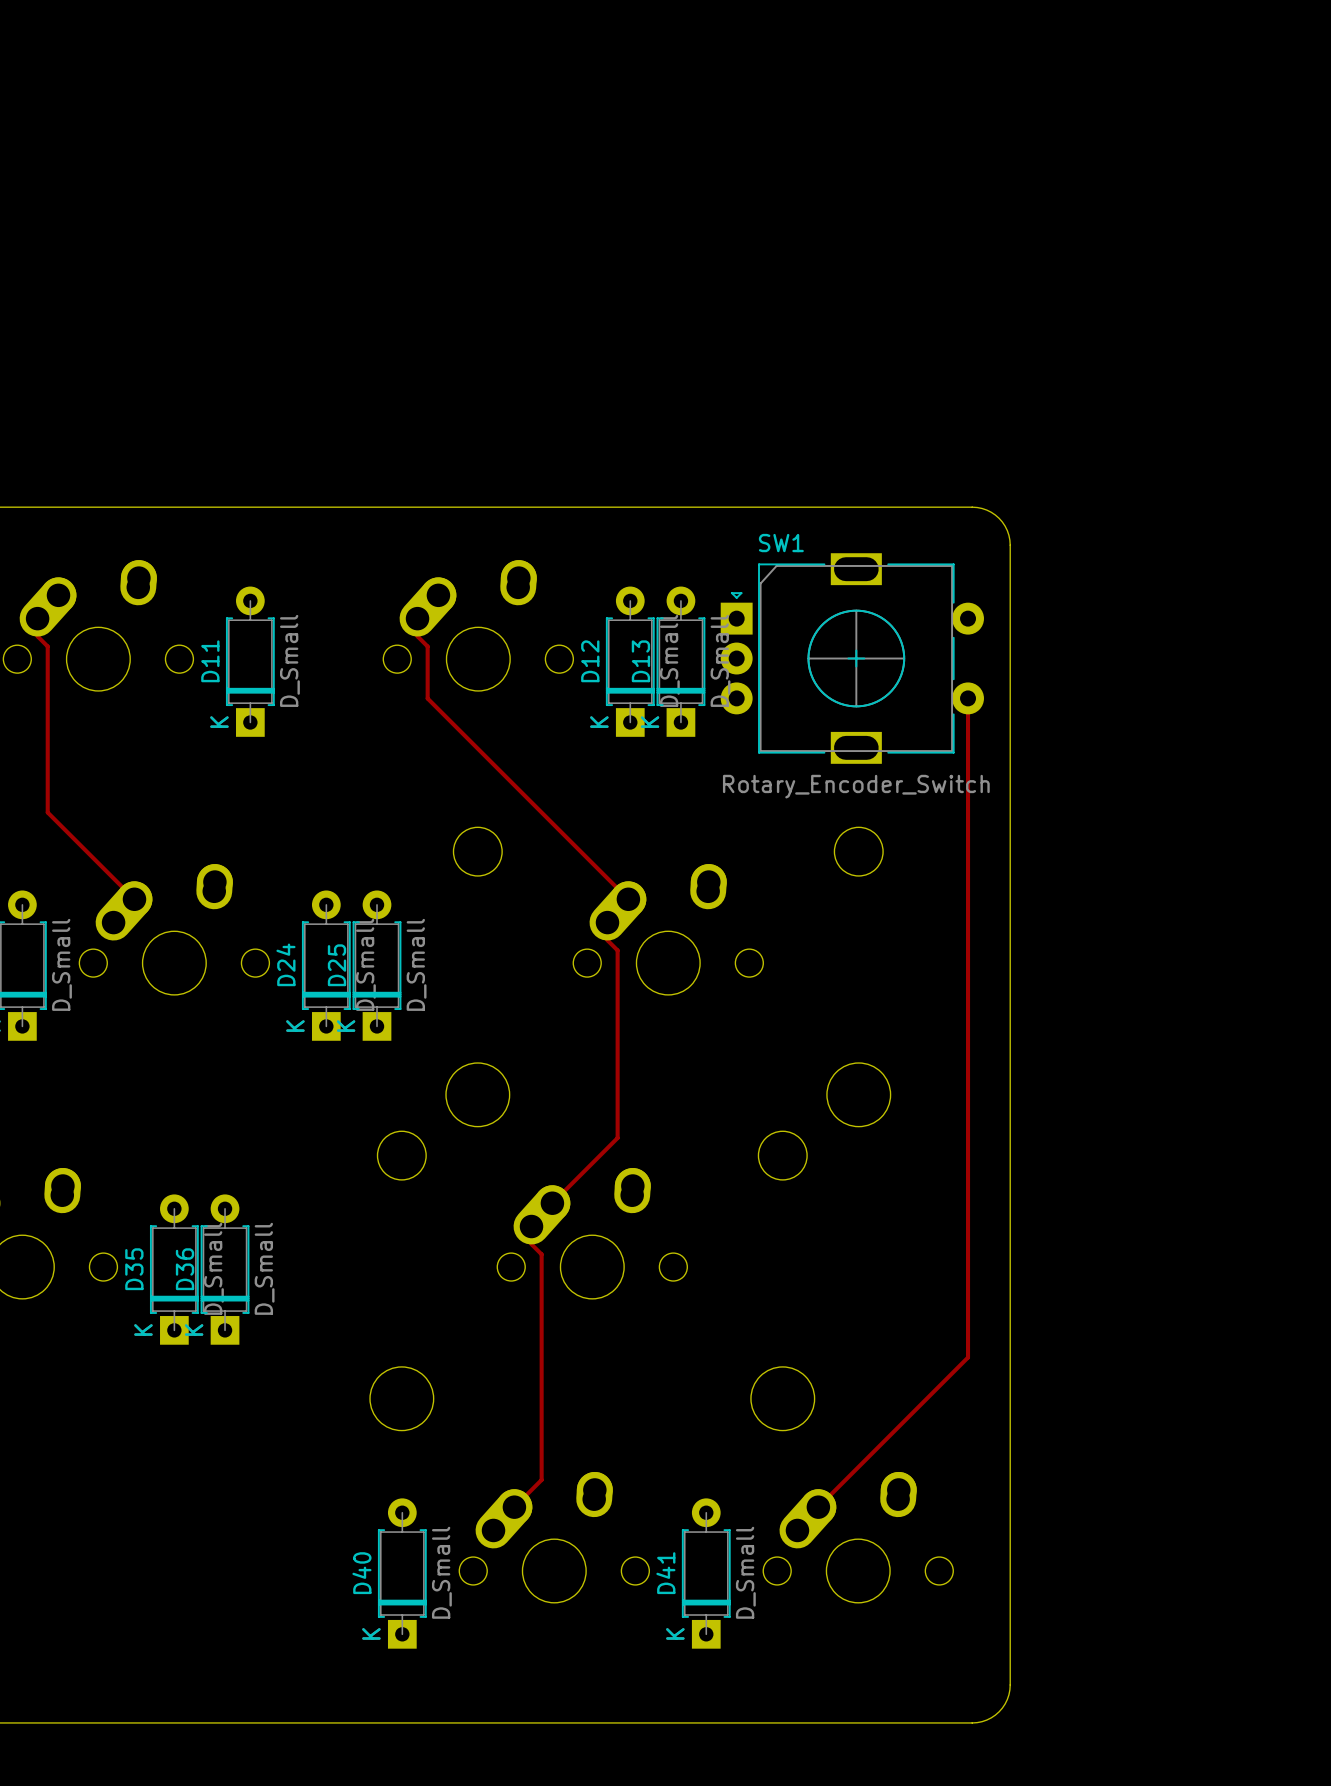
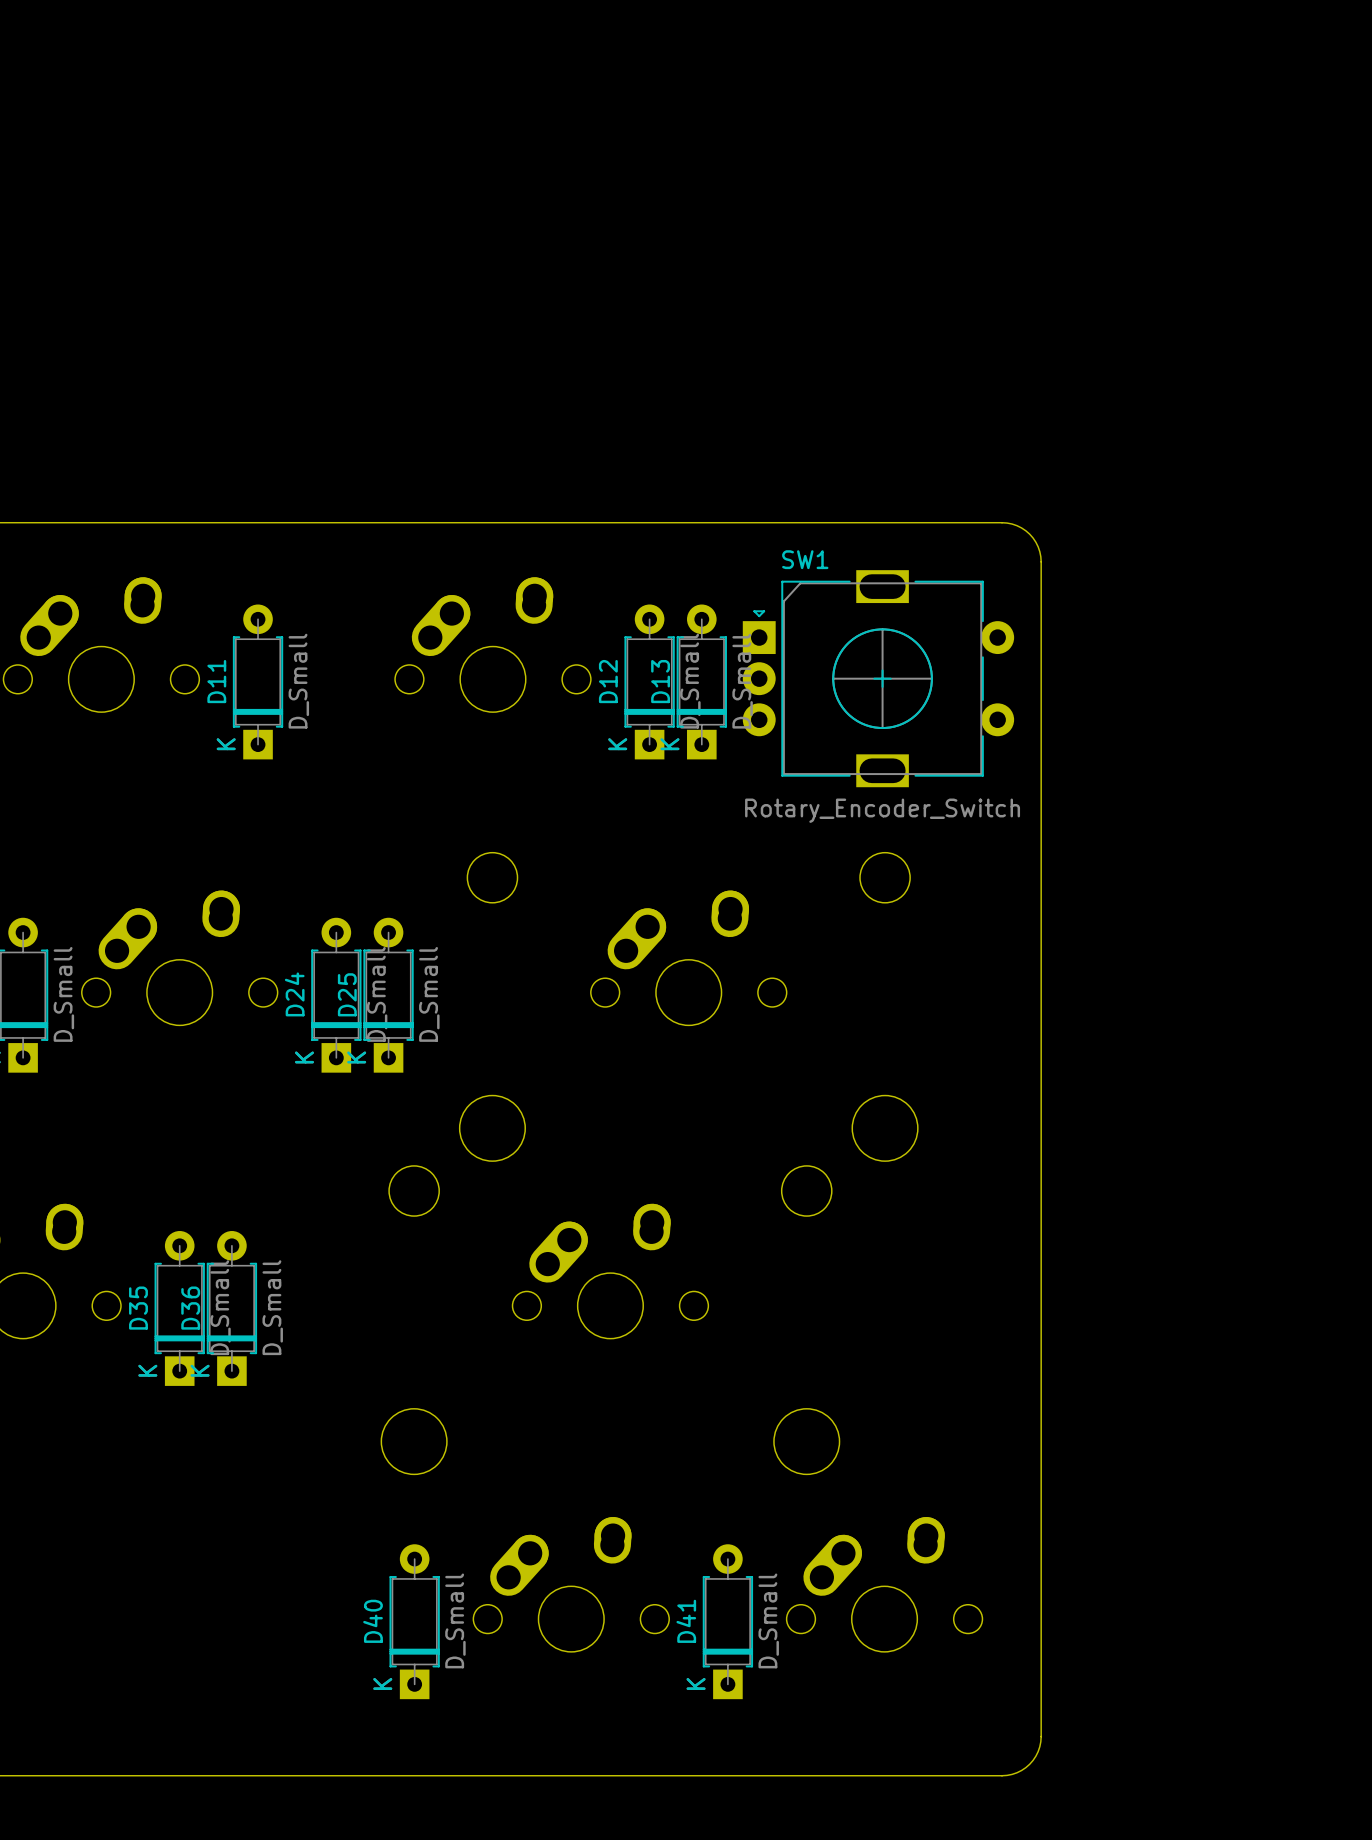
top track: (37, 618) (37, 636) (47, 646) (47, 812) (134, 899) -> none
top track: (417, 618) (417, 636) (427, 646) (427, 698) (628, 899) -> none
top track: (968, 698) (968, 1357) (797, 1528) (797, 1530) -> none
top track: (607, 922) (607, 940) (617, 950) (617, 1138) (552, 1203) -> none
top track: (531, 1226) (531, 1244) (541, 1254) (541, 1479) (514, 1507) -> none

